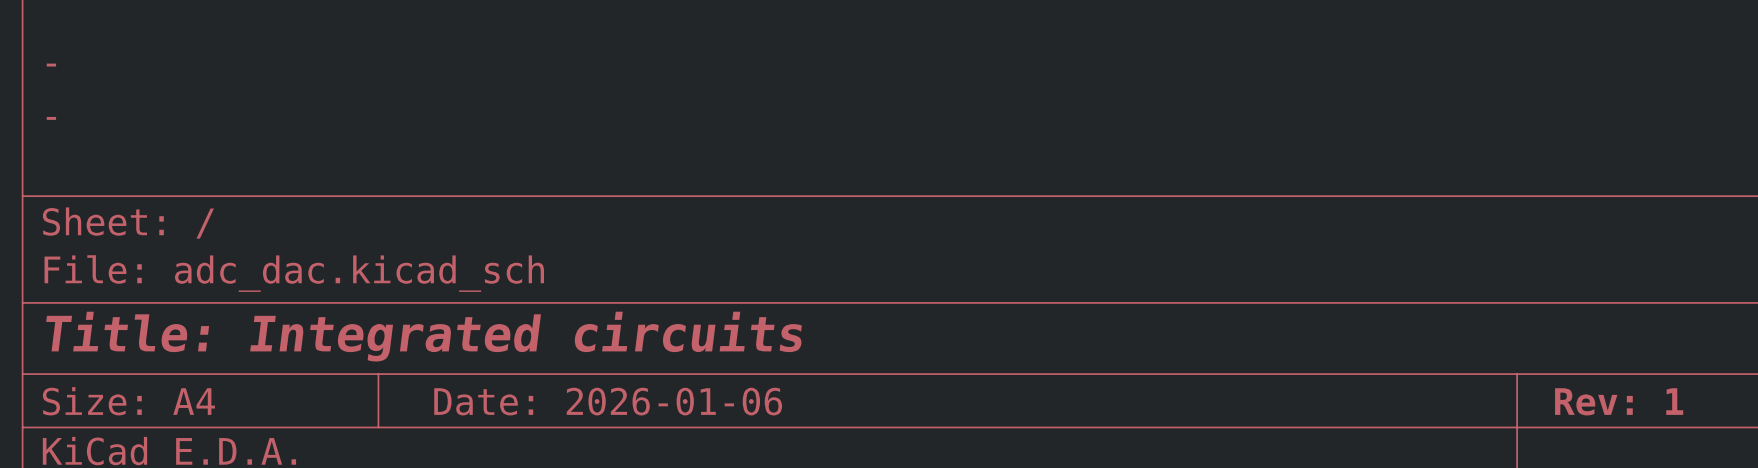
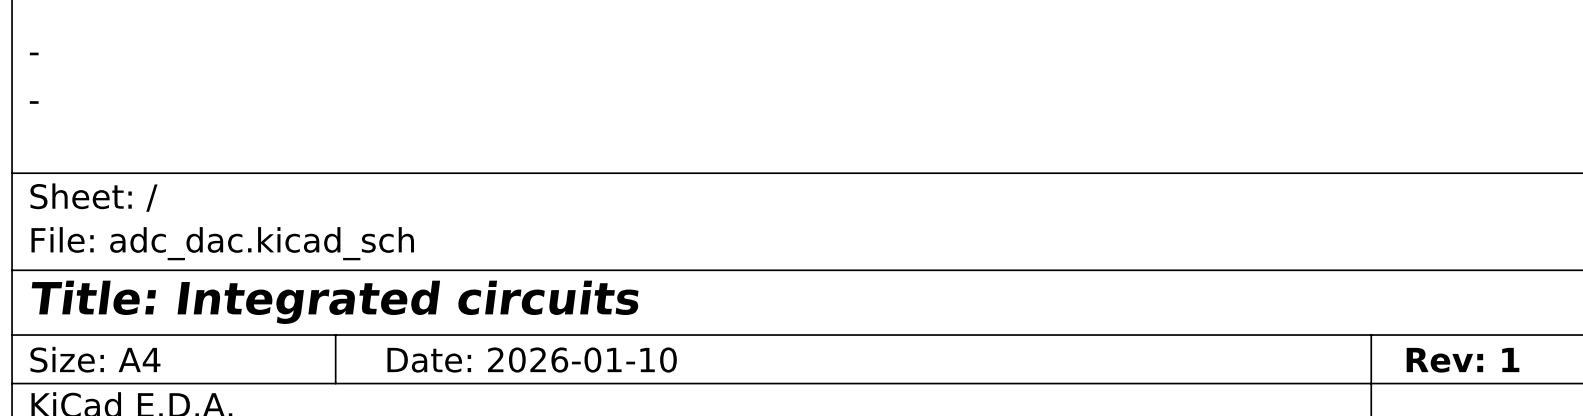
title block: Date: 2026-01-06 (608, 401) -> Date: 2026-01-10 (532, 360)

